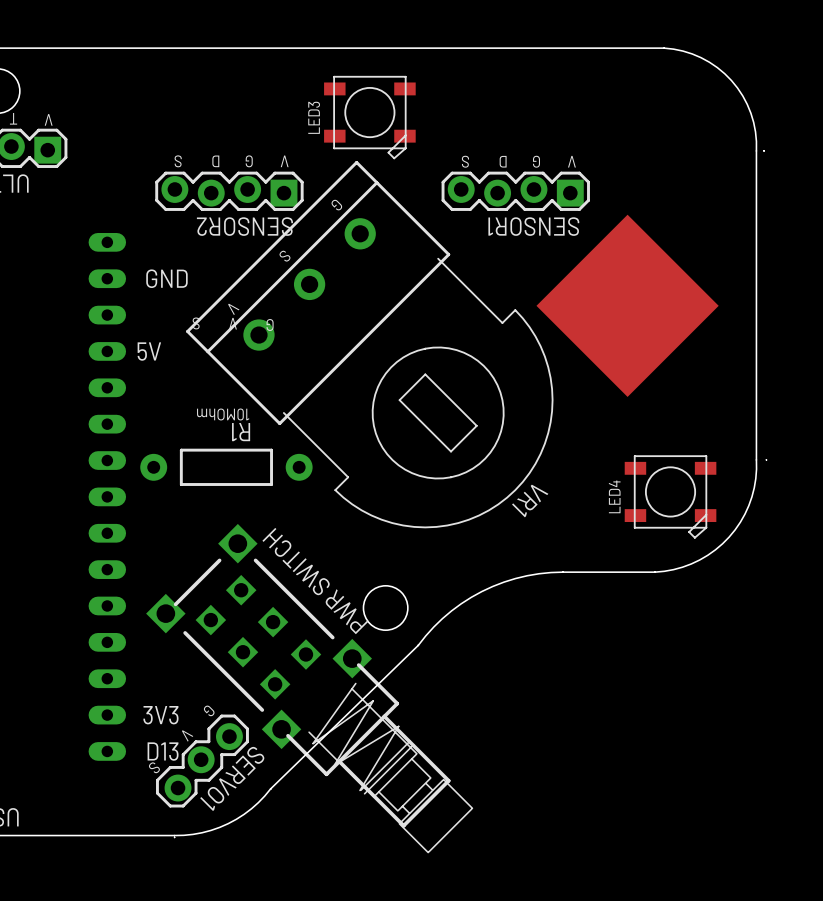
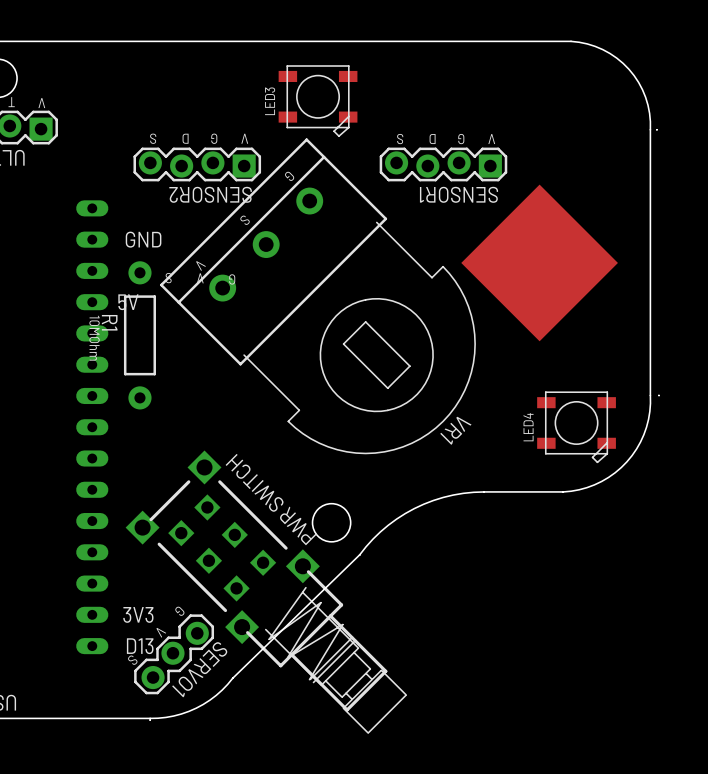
R1 value position: 10MOhm (223, 414) -> 10MOhm (94, 338)
R1 name position: R1 (241, 432) -> R1 (109, 322)
R1 rotation: 0° (226, 467) -> 90° clockwise (139, 335)

